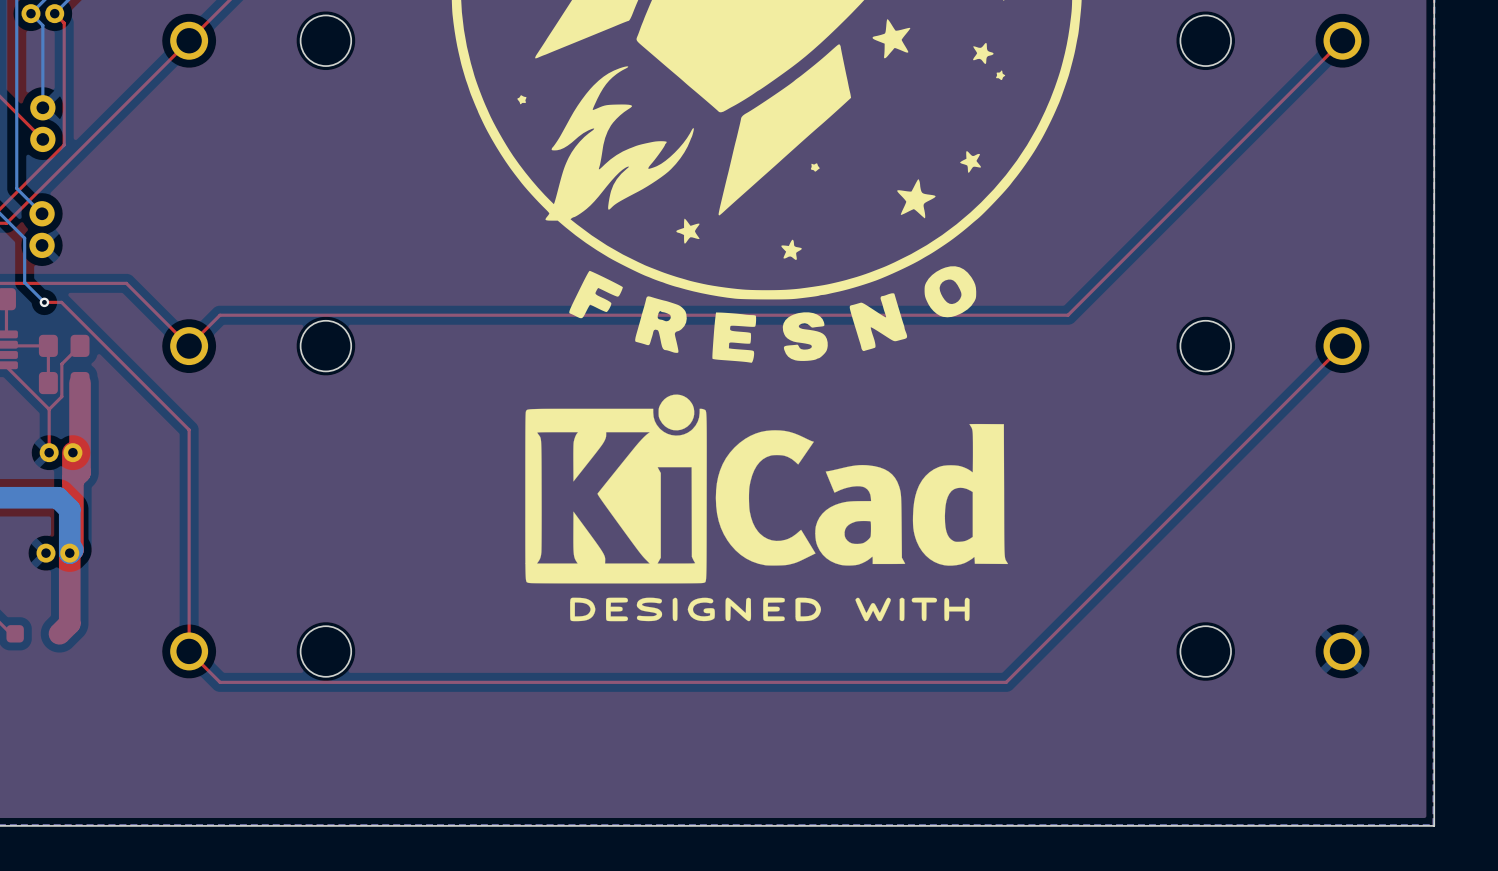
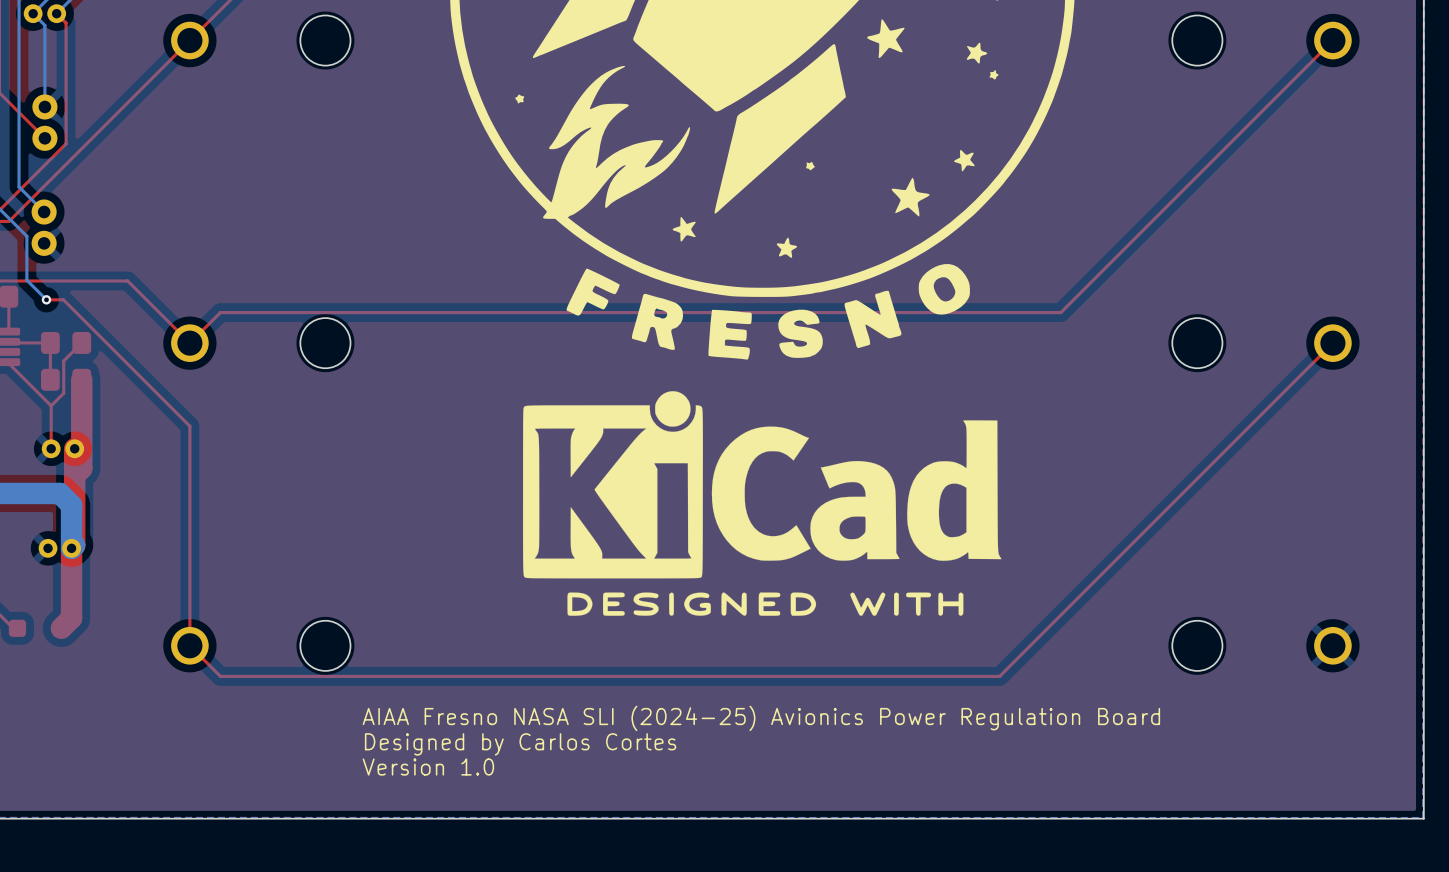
text: none -> AIAA Fresno NASA SLI (2024-25) Avionics Power Regulation Board (761, 718)
text: none -> Designed by Carlos Cortes (520, 744)
text: none -> Version 1.0 (428, 767)

